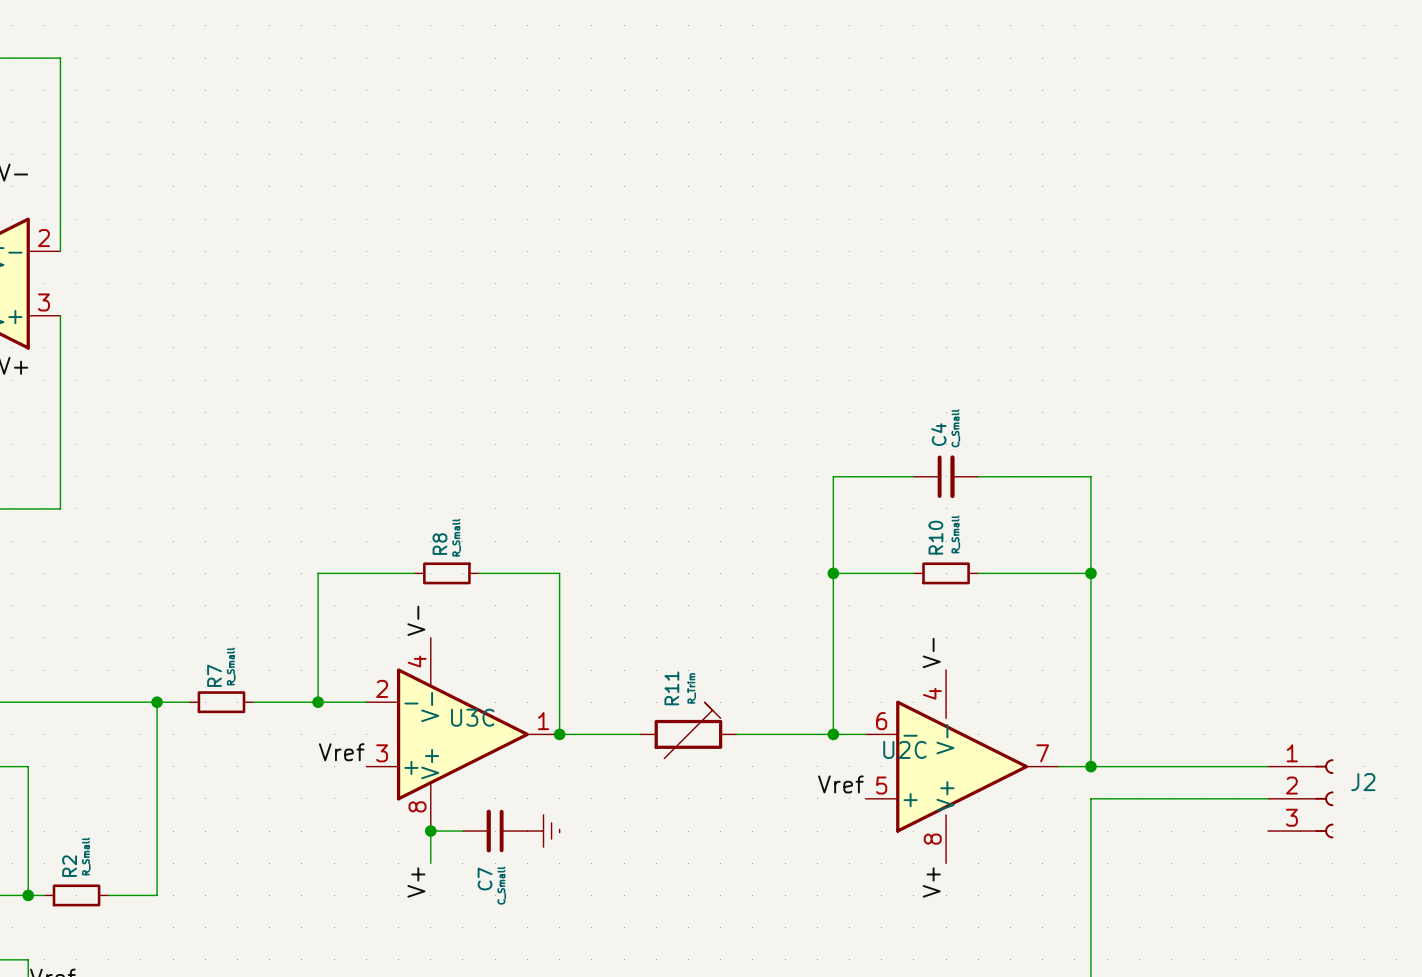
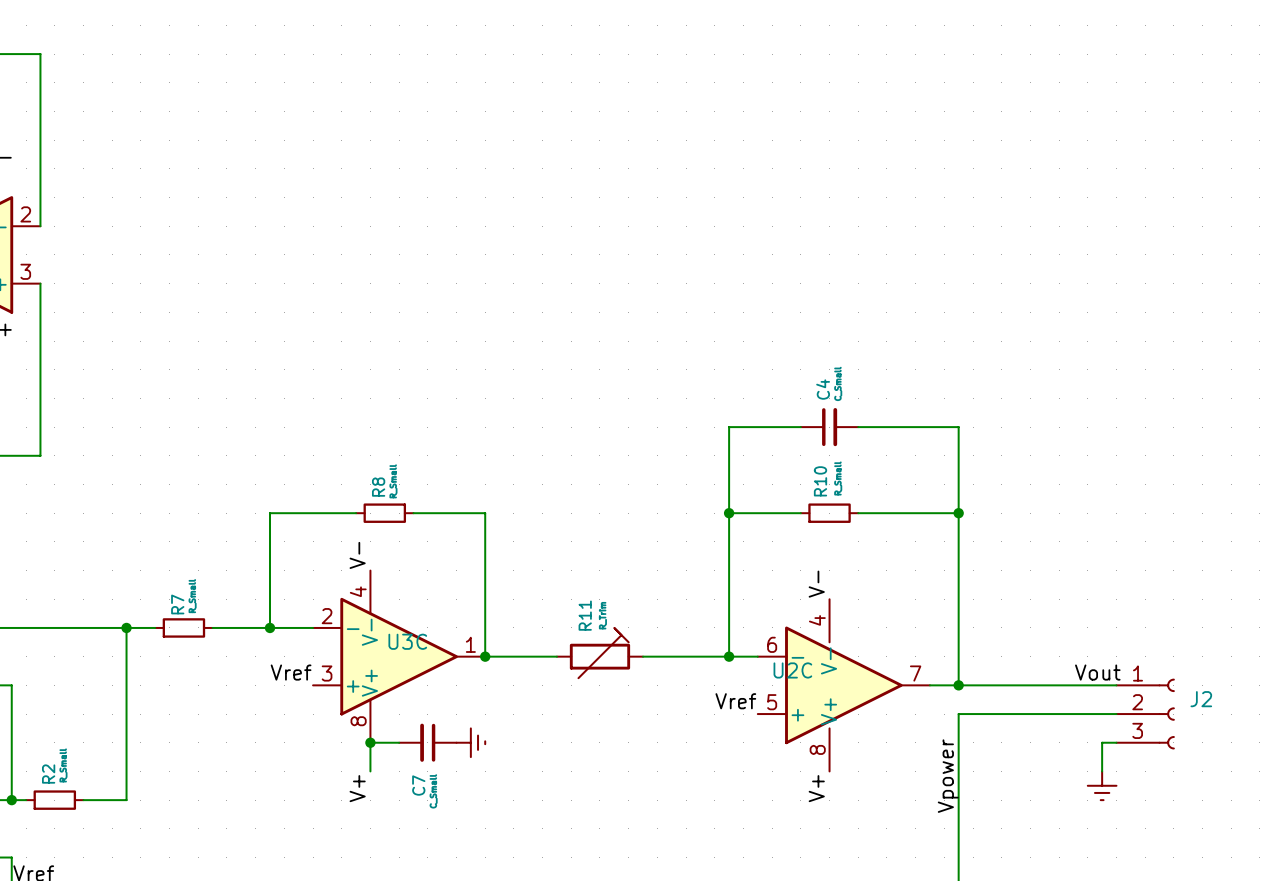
label: none -> Vout (1097, 672)
wire: none -> (1116, 742) (1102, 742) (1102, 771)
label: none -> Vpower (948, 776)
power symbol: none -> (1102, 785)

